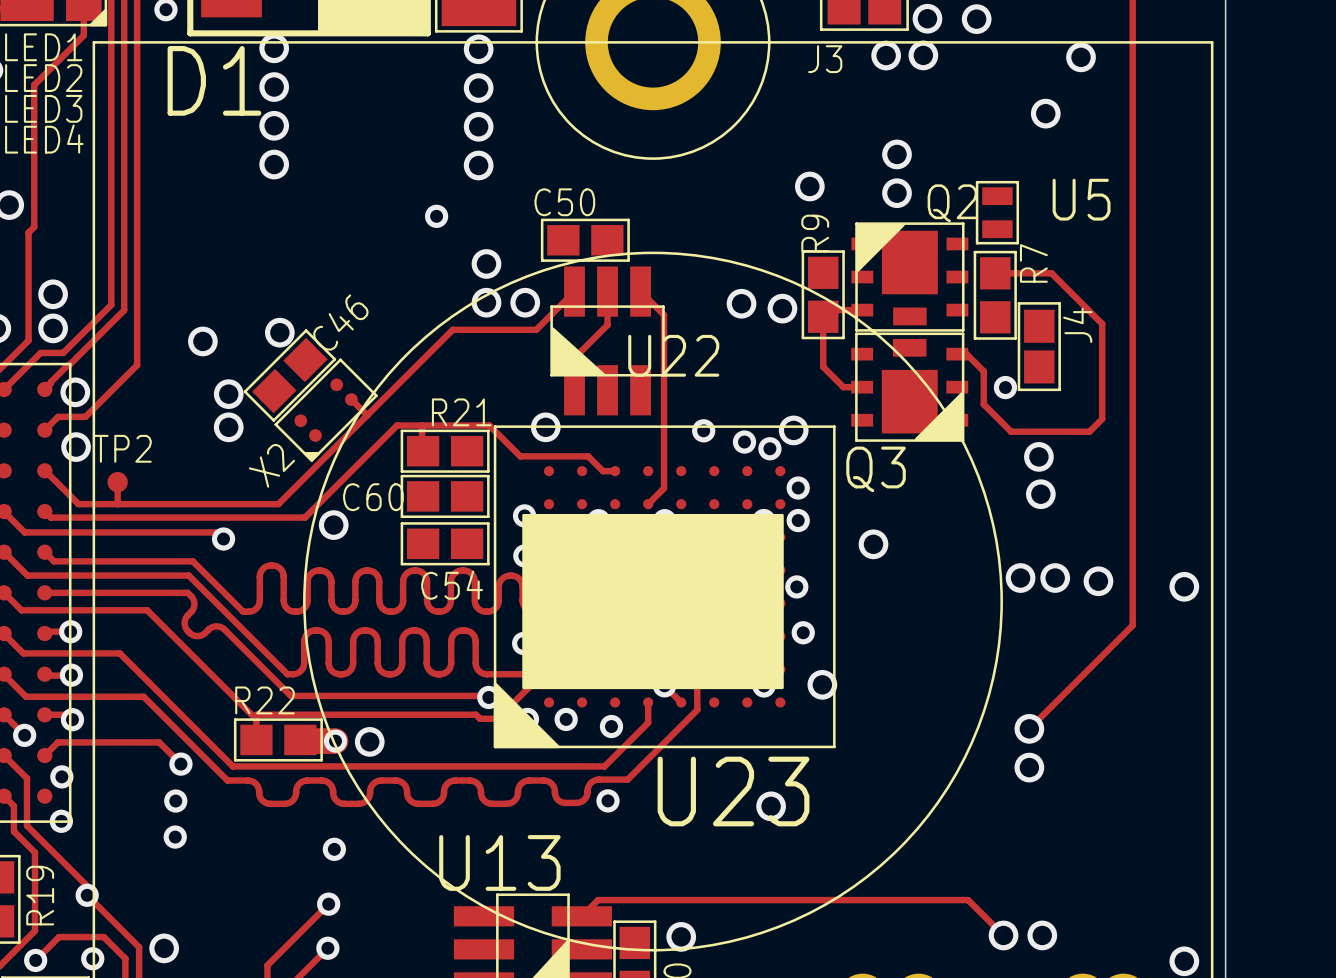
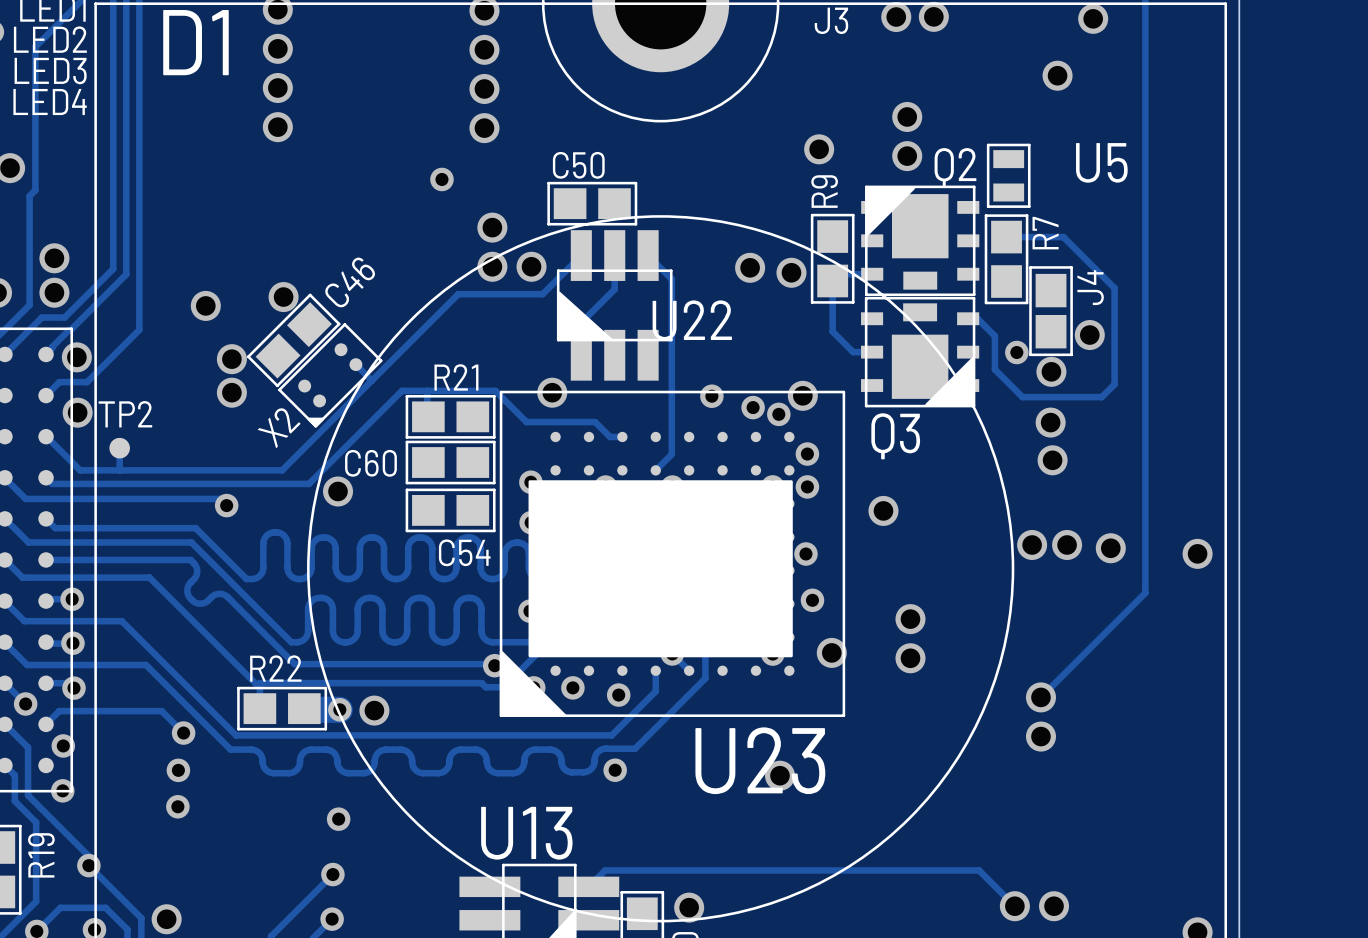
via: none -> (1089, 335)
via: none -> (1051, 371)
via: none -> (910, 619)
via: none -> (910, 658)

